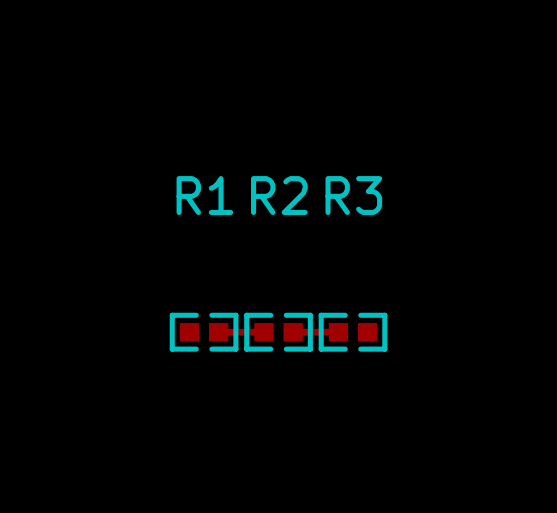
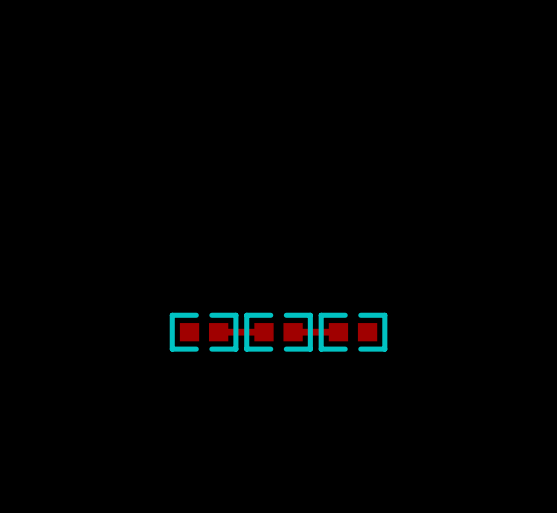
R1 name: R1 (204, 195) -> none
R2 name: R2 (279, 195) -> none
R3 name: R3 (353, 195) -> none

